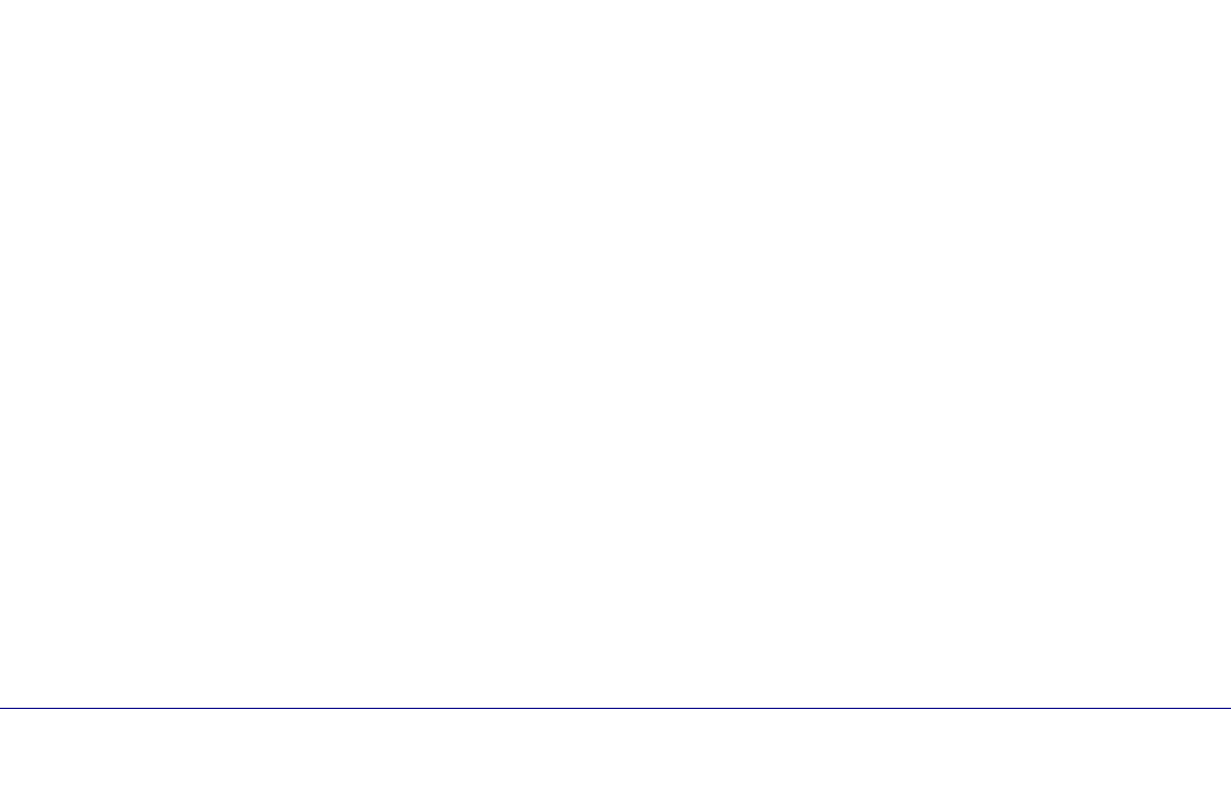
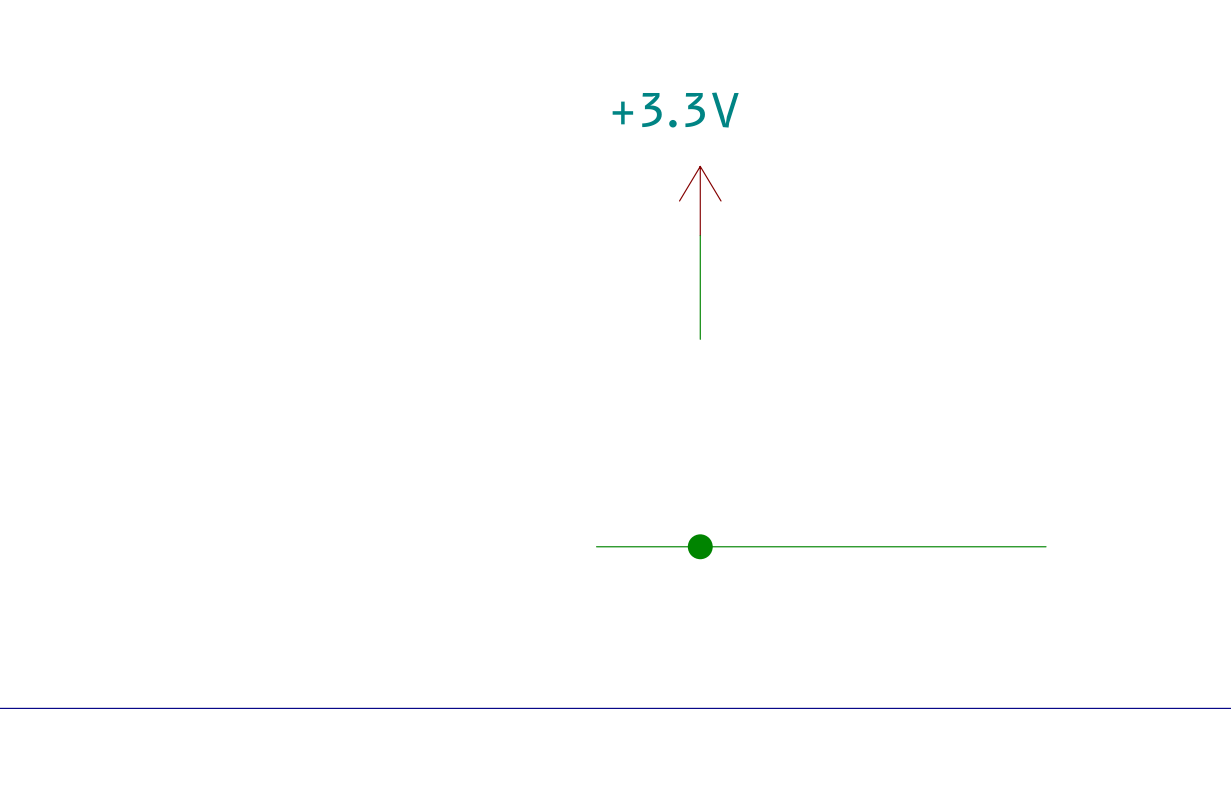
power symbol: none -> +3.3V (700, 201)
wire: none -> (700, 235) (700, 339)
wire: none -> (596, 546) (1046, 546)
junction: none -> (700, 546)

